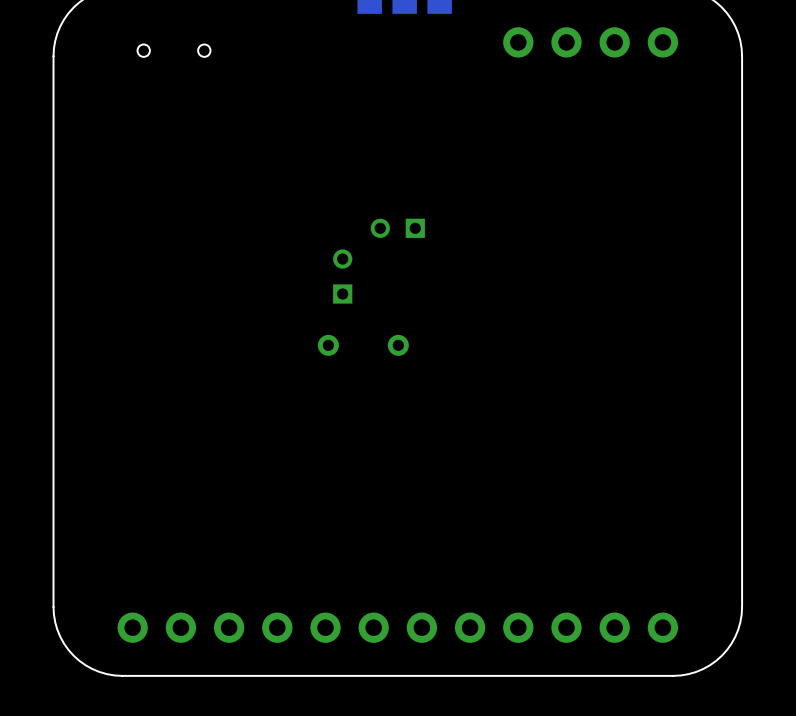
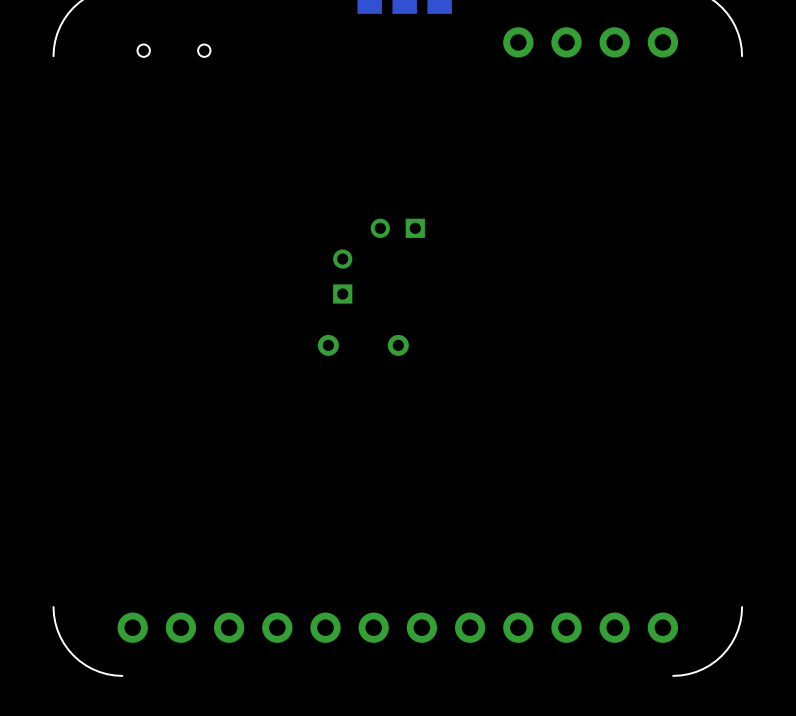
board edge: (53, 56) (53, 607) -> none
board edge: (742, 56) (742, 607) -> none
board edge: (673, 675) (122, 675) -> none

